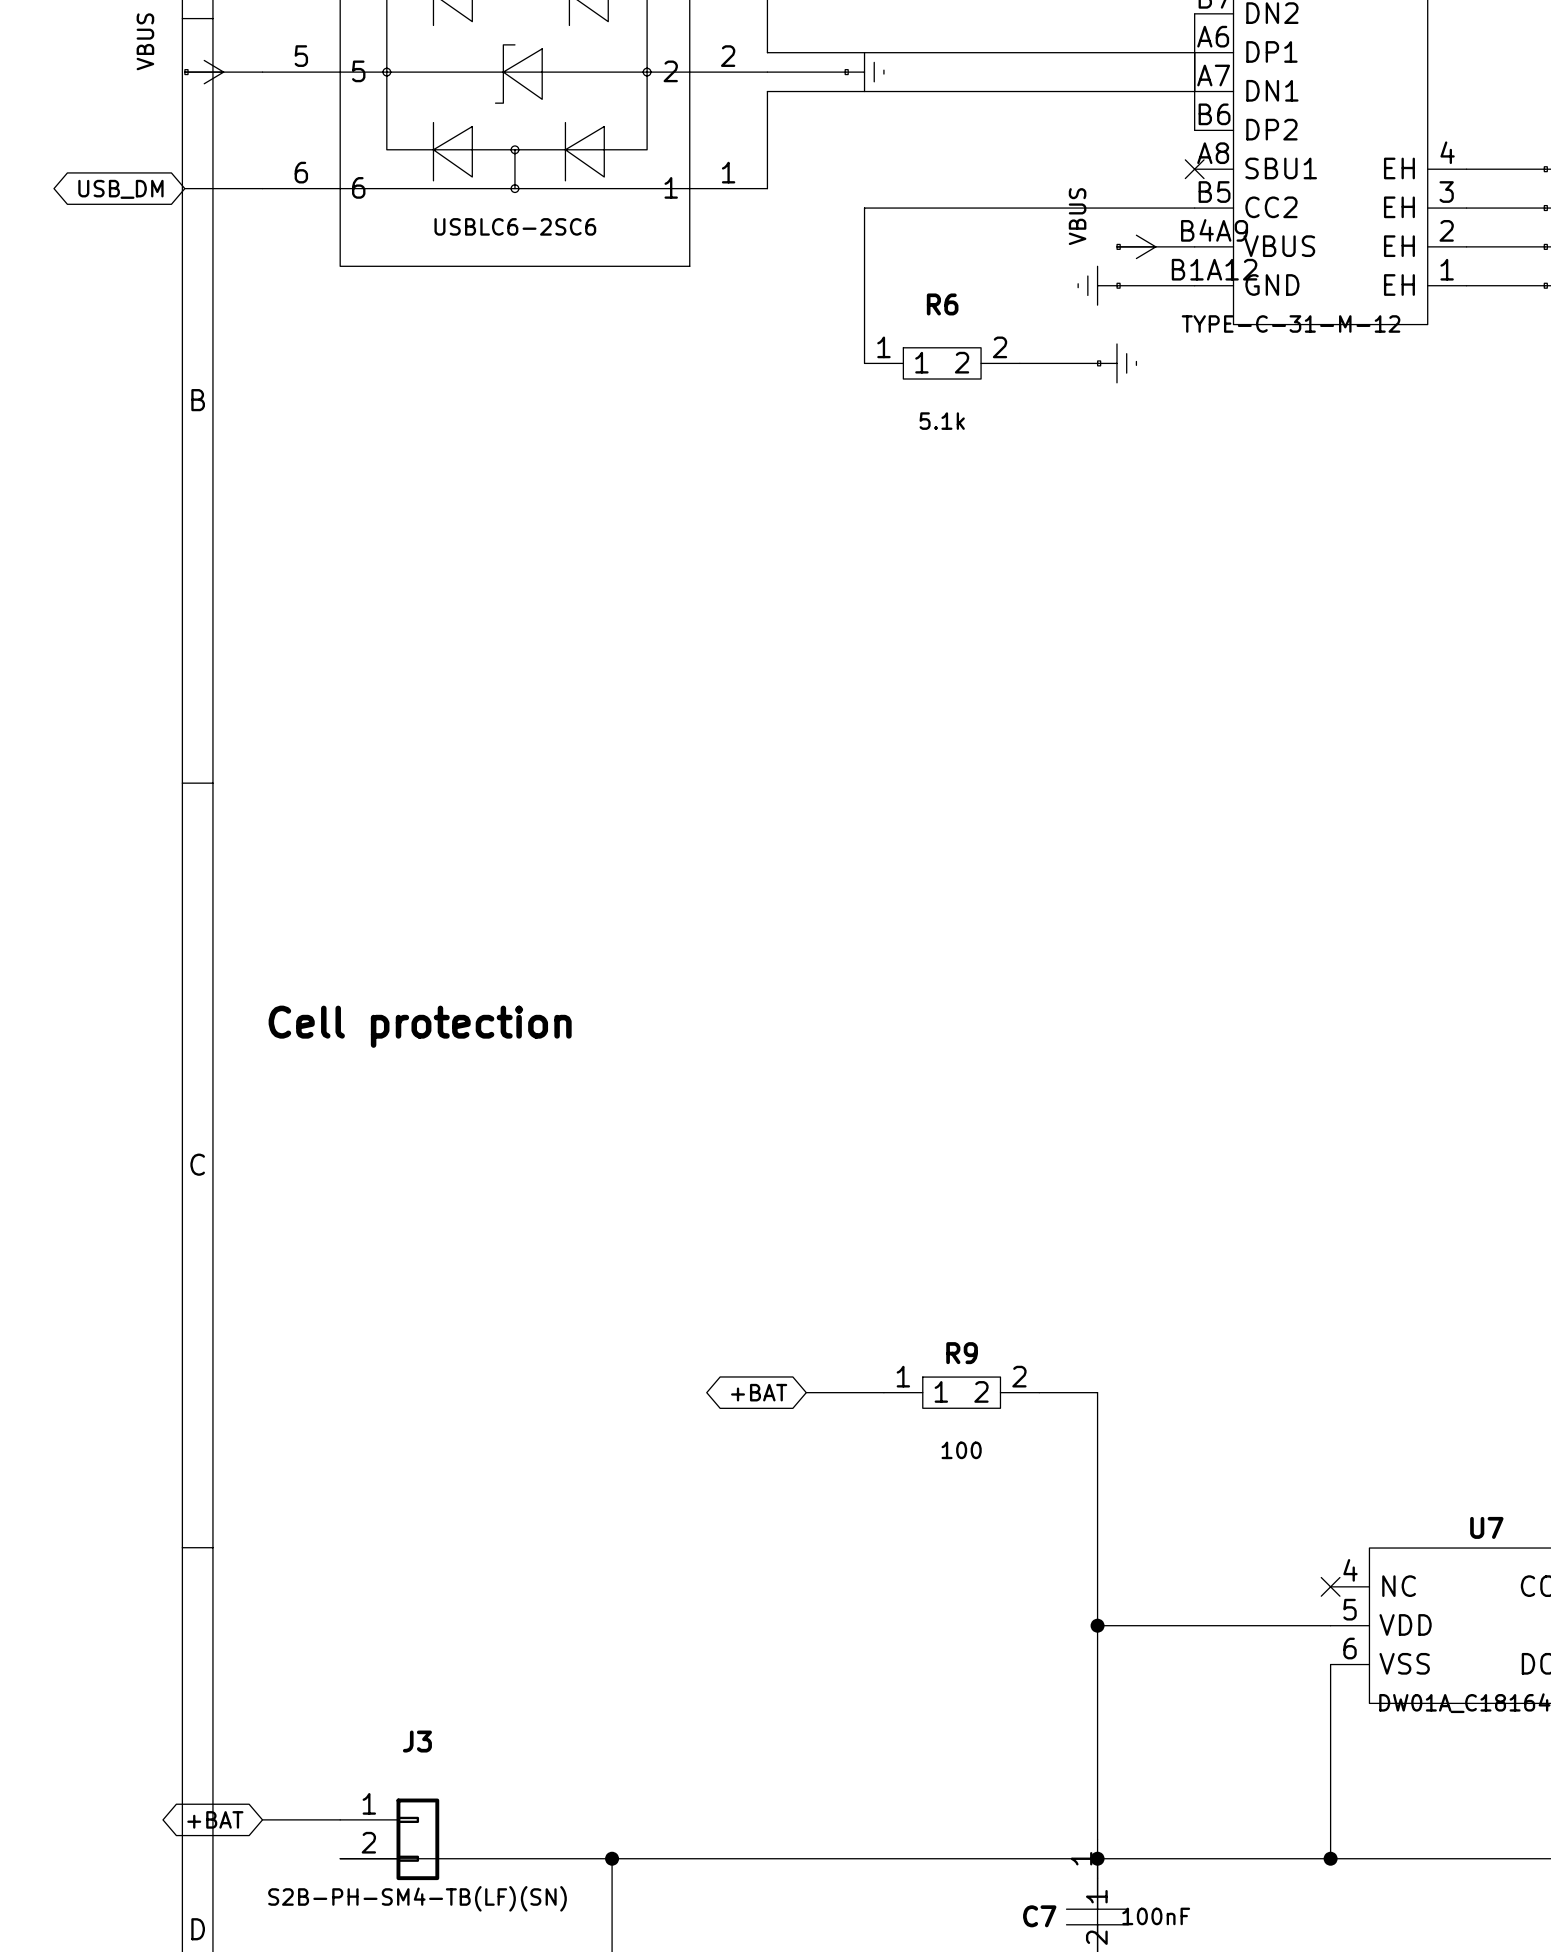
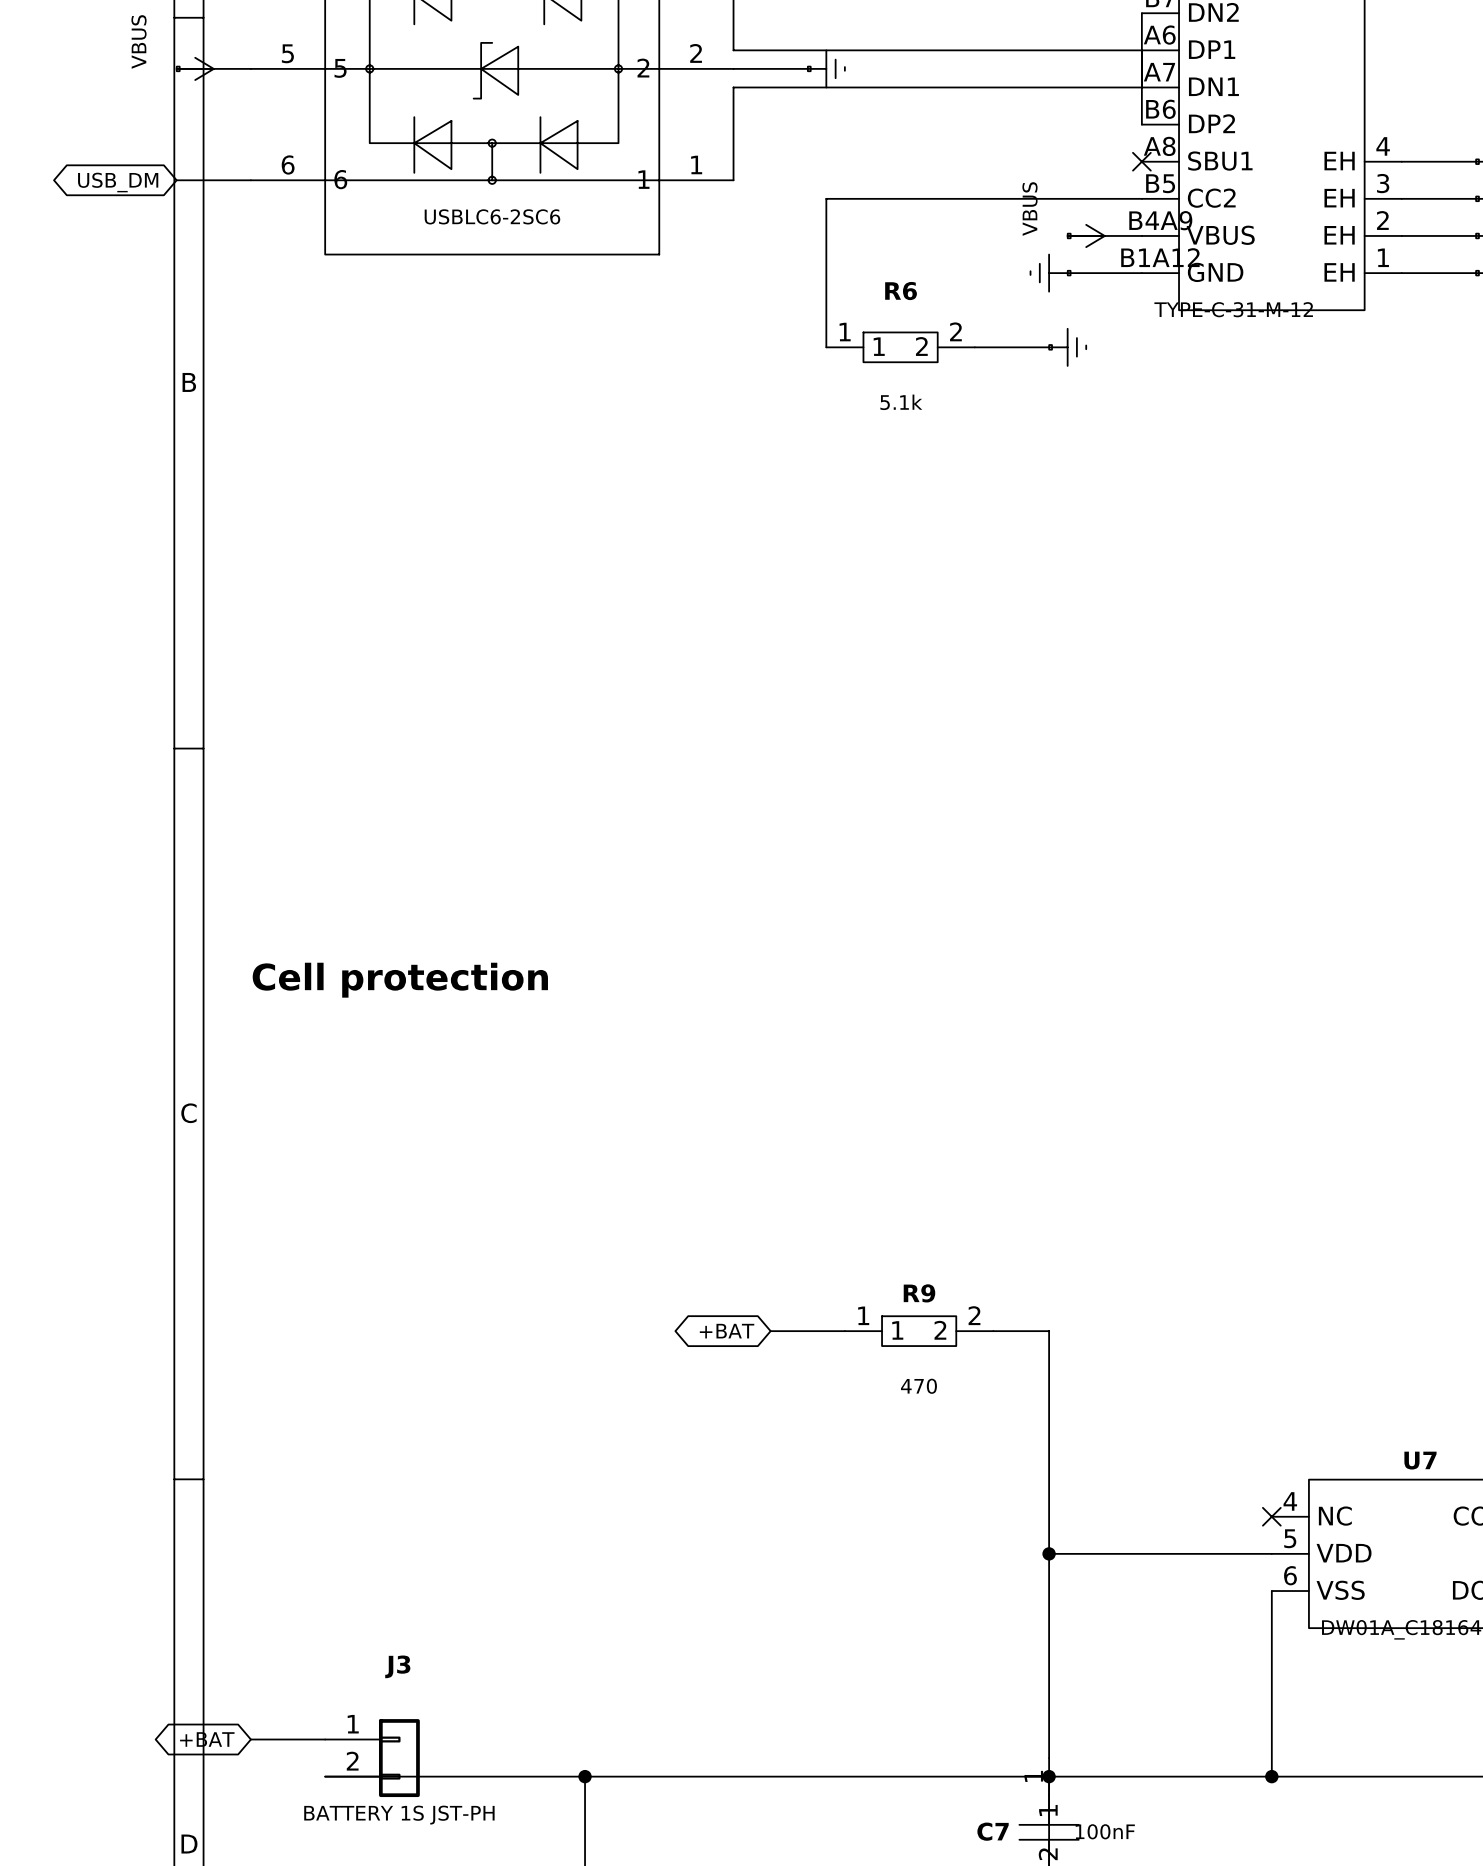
R9 value: 100 (961, 1450) -> 470 (918, 1386)
J3 value: S2B-PH-SM4-TB(LF)(SN) (417, 1898) -> BATTERY 1S JST-PH (399, 1815)

